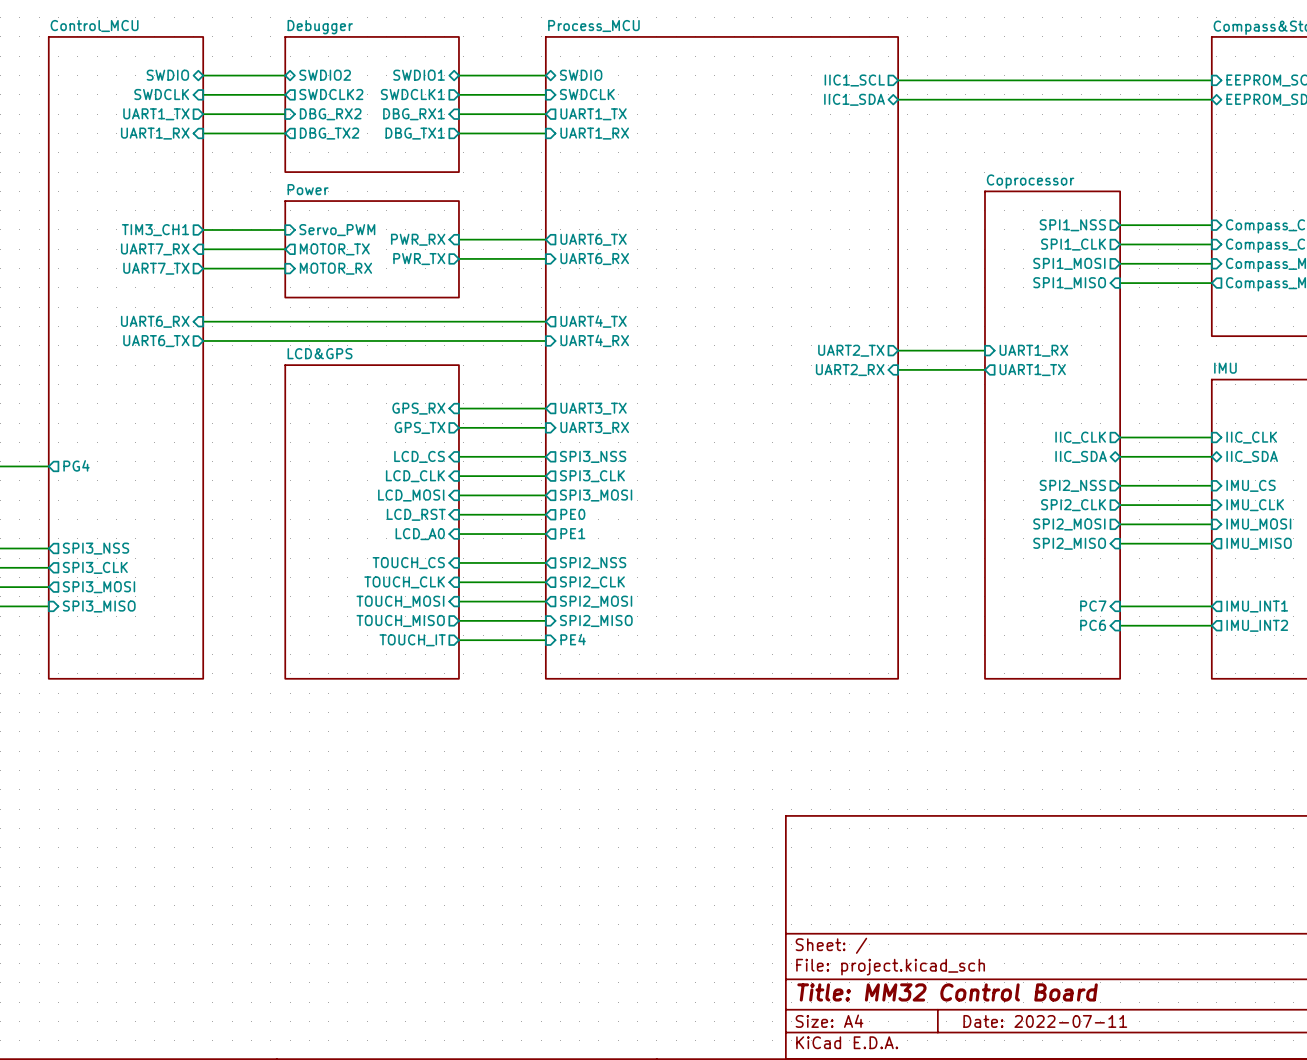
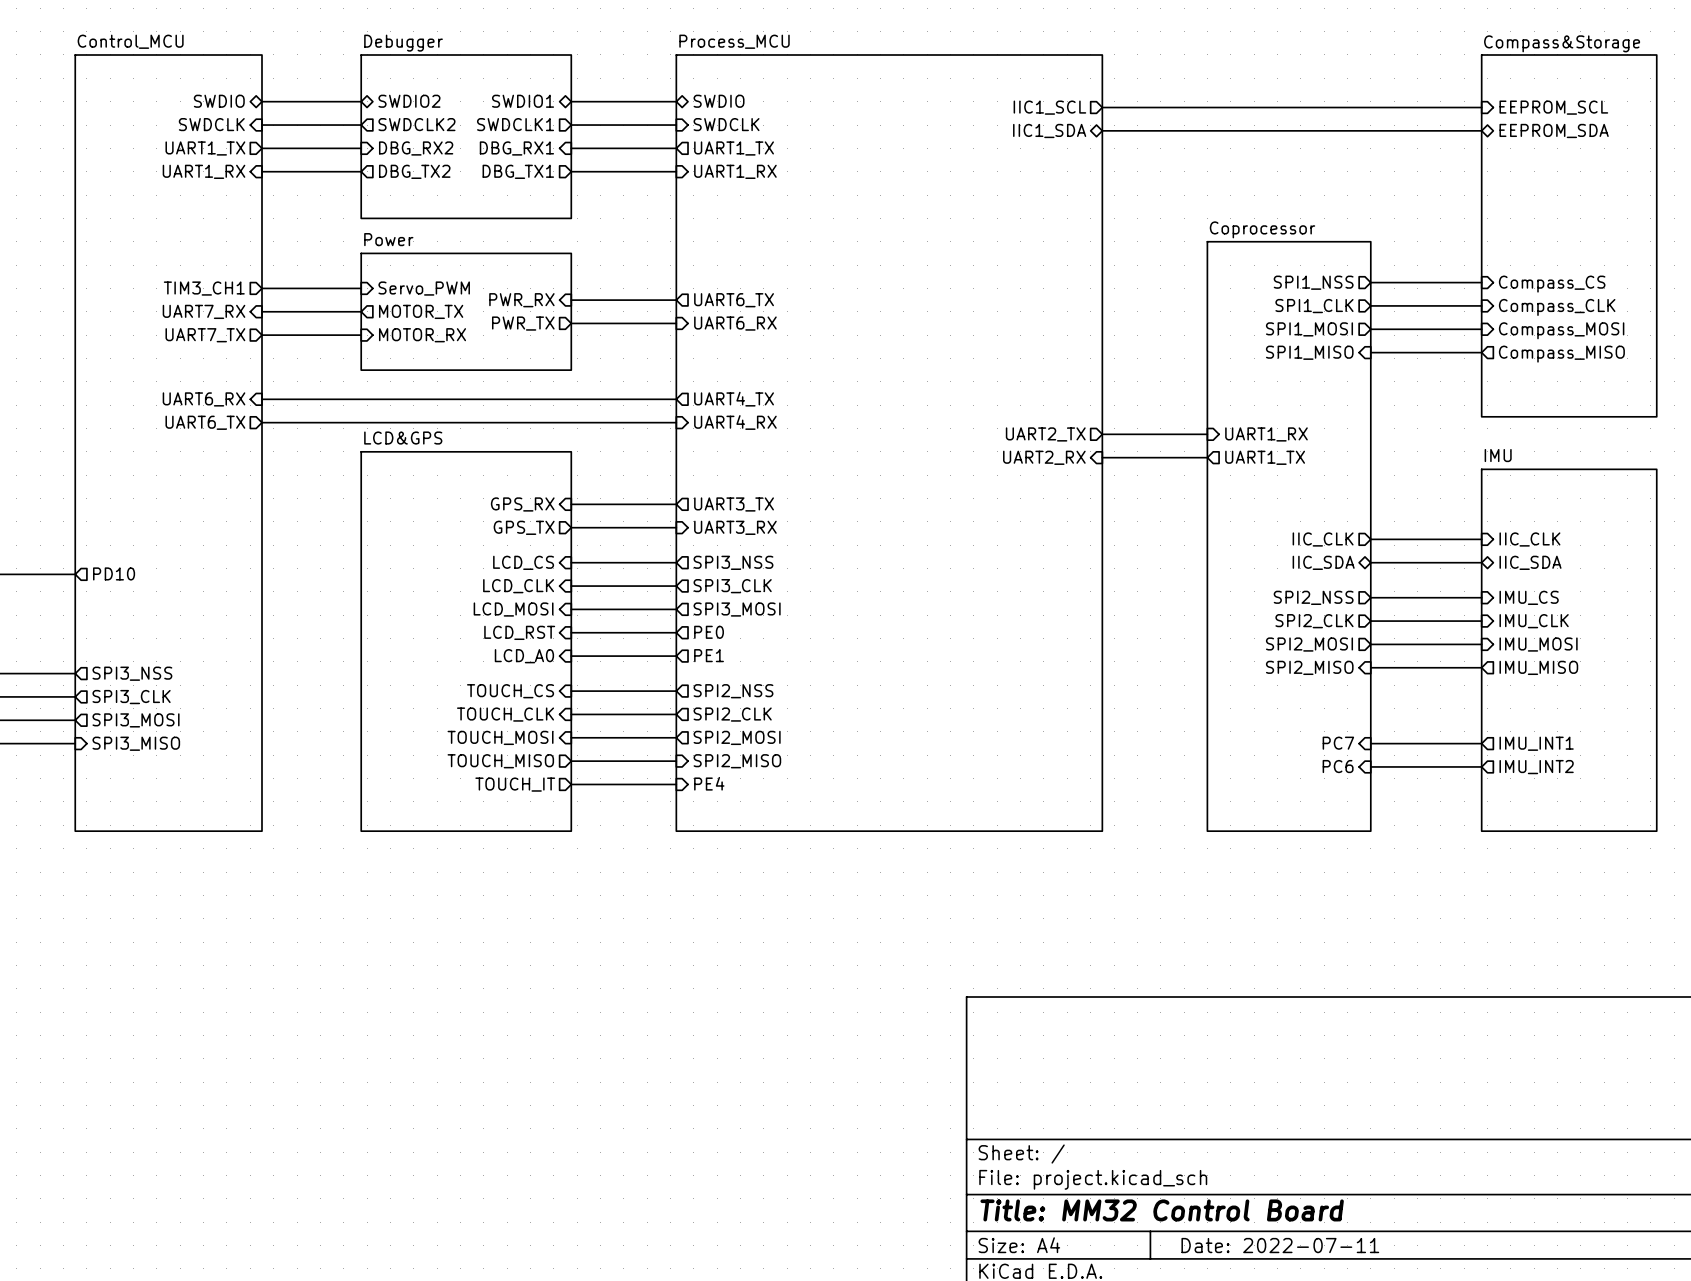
sheet pin: PG4 (76, 465) -> PD10 (114, 573)

